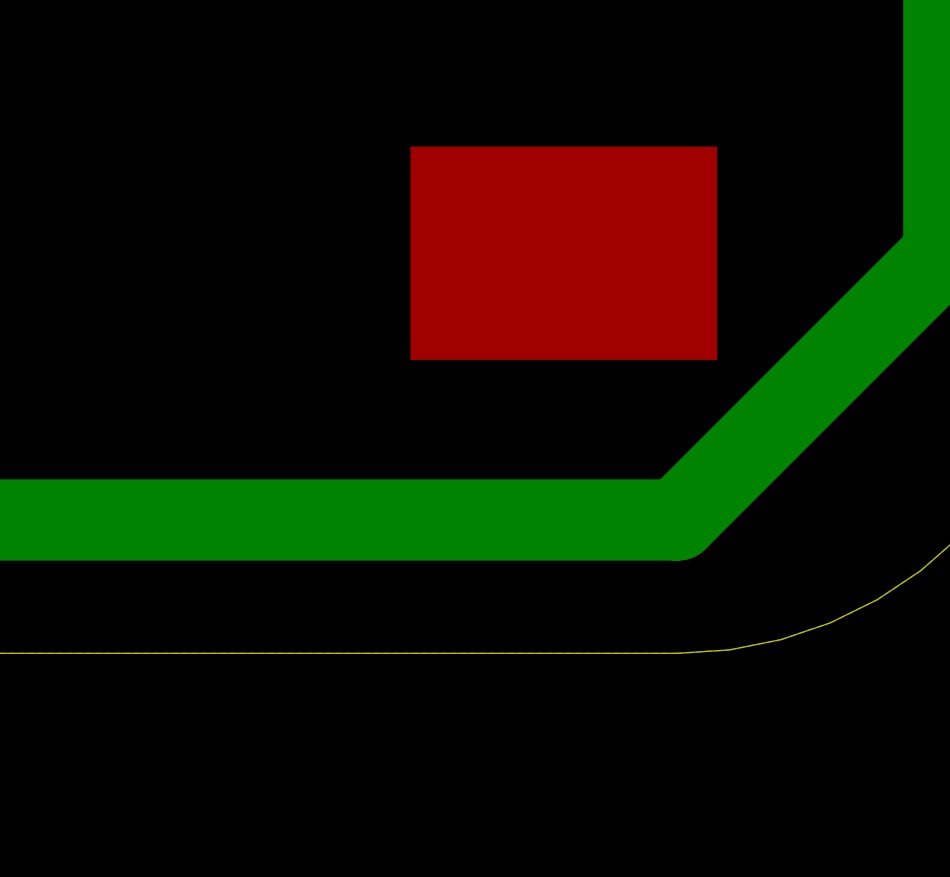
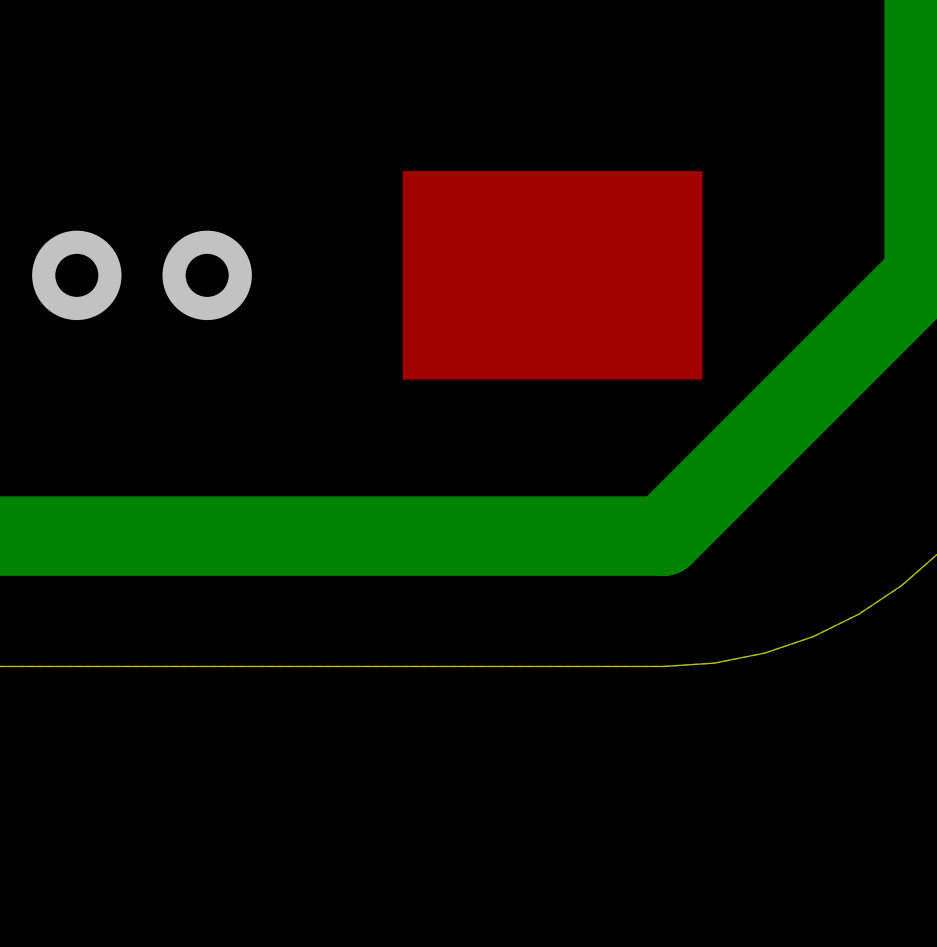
via: none -> (76, 275)
via: none -> (207, 275)

